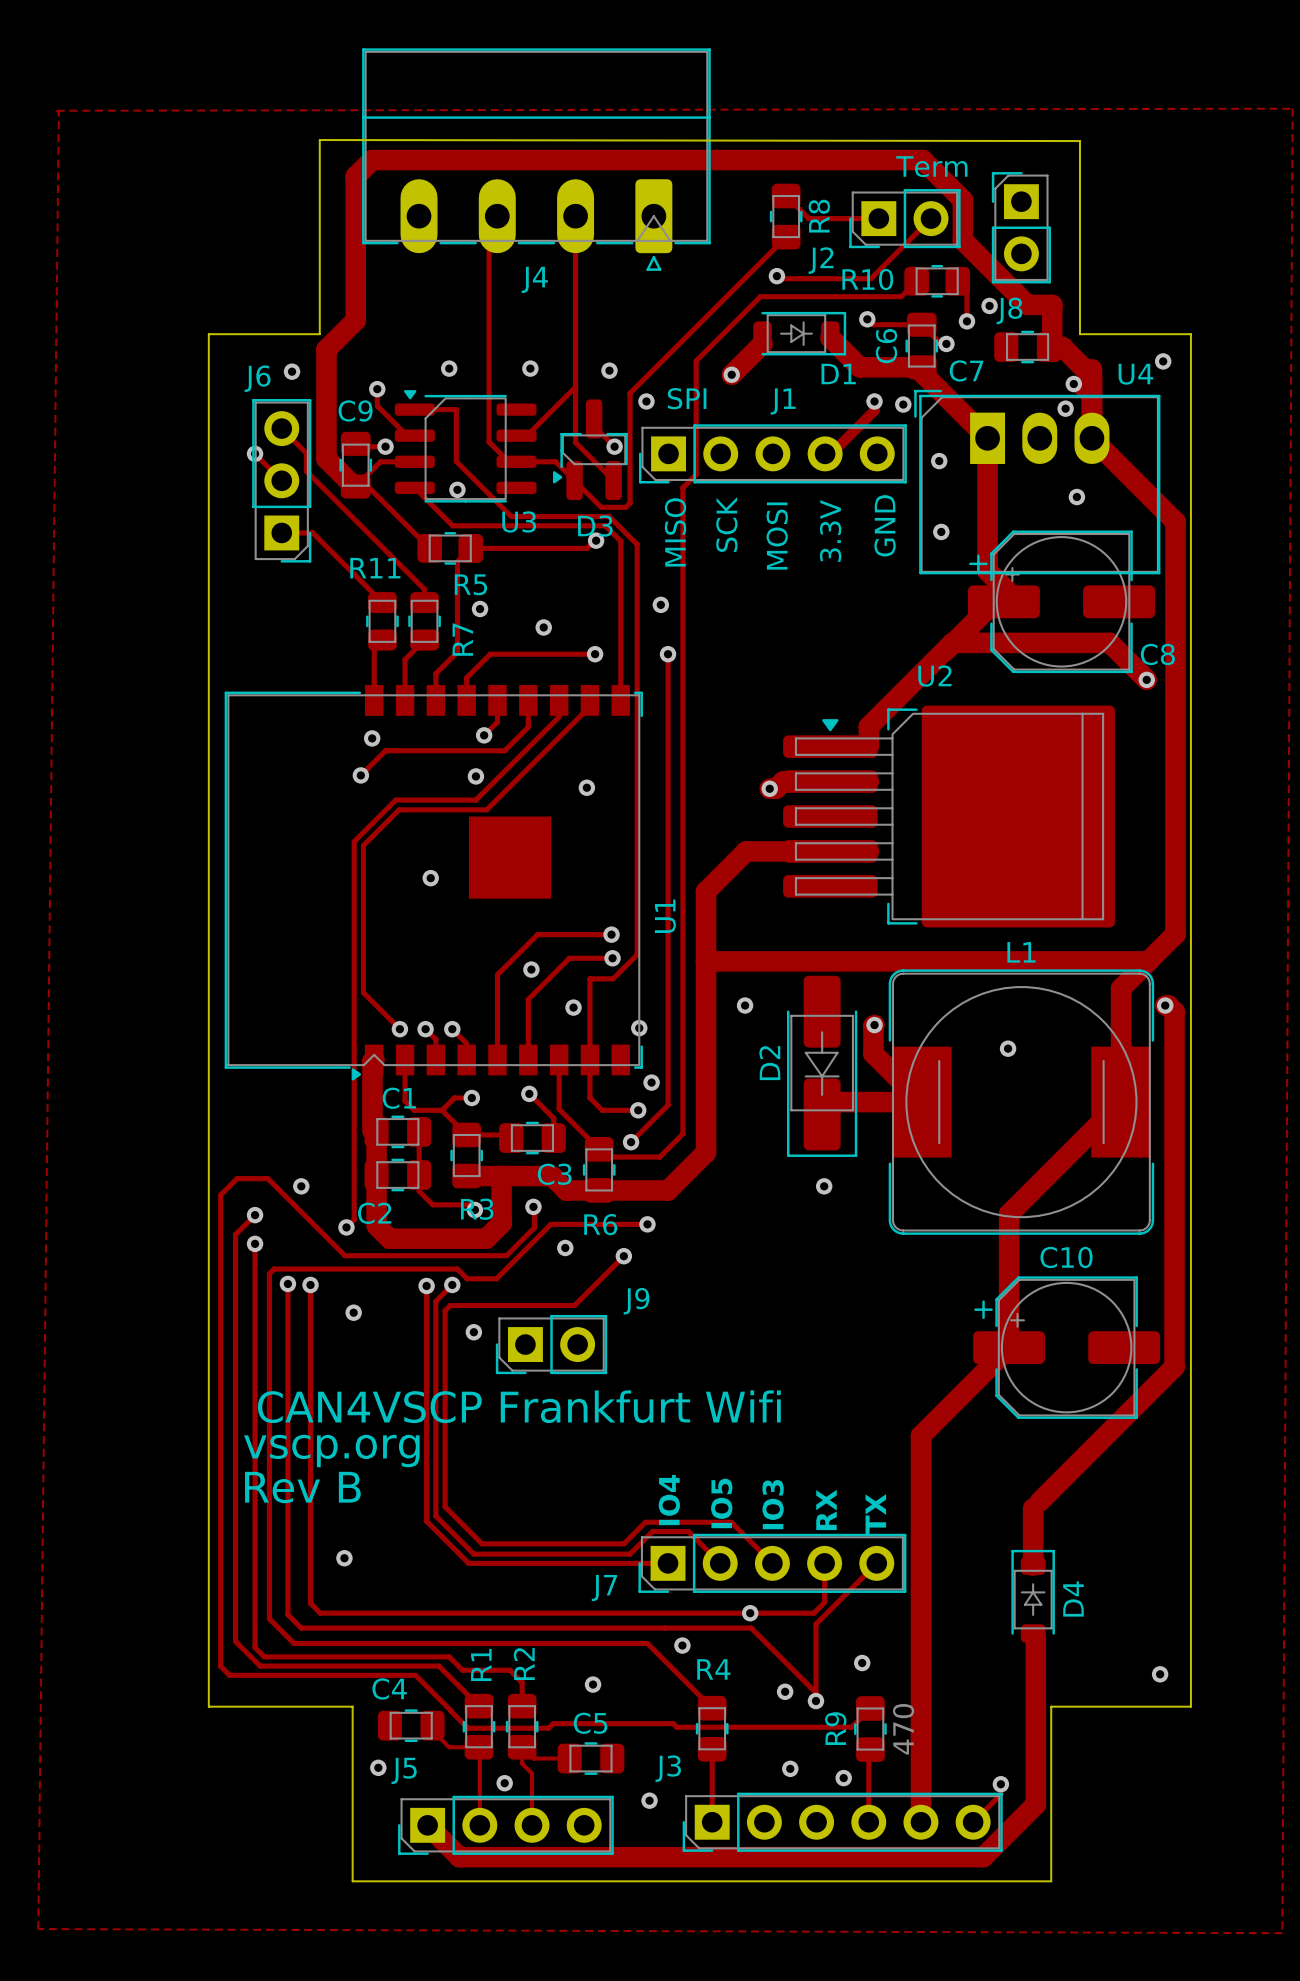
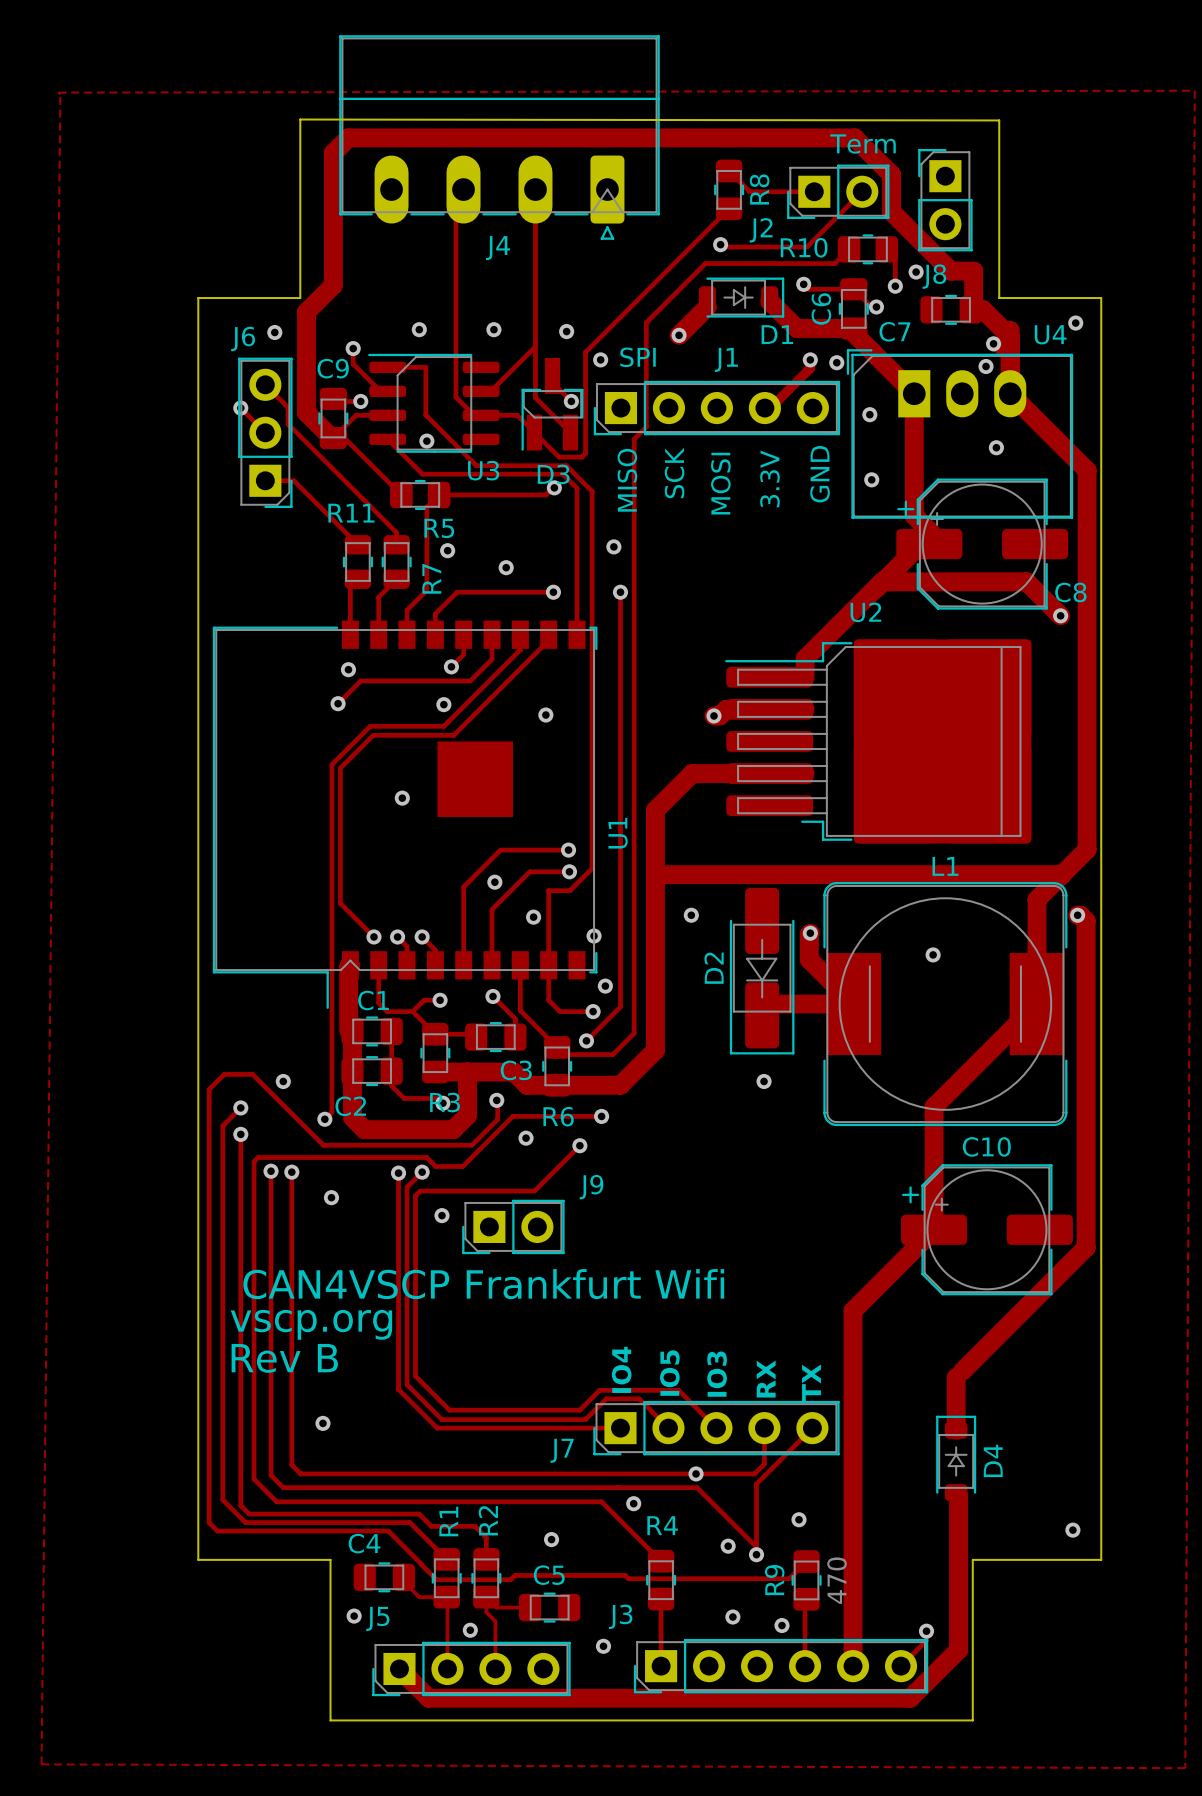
U3 footprint: [394, 390, 537, 503] -> [368, 353, 500, 453]
D3 footprint: [552, 399, 628, 501] -> [521, 358, 584, 451]
U1 footprint: [224, 685, 643, 1081] -> [212, 620, 598, 1009]
U2 footprint: [783, 705, 1115, 928] -> [725, 639, 1032, 844]

